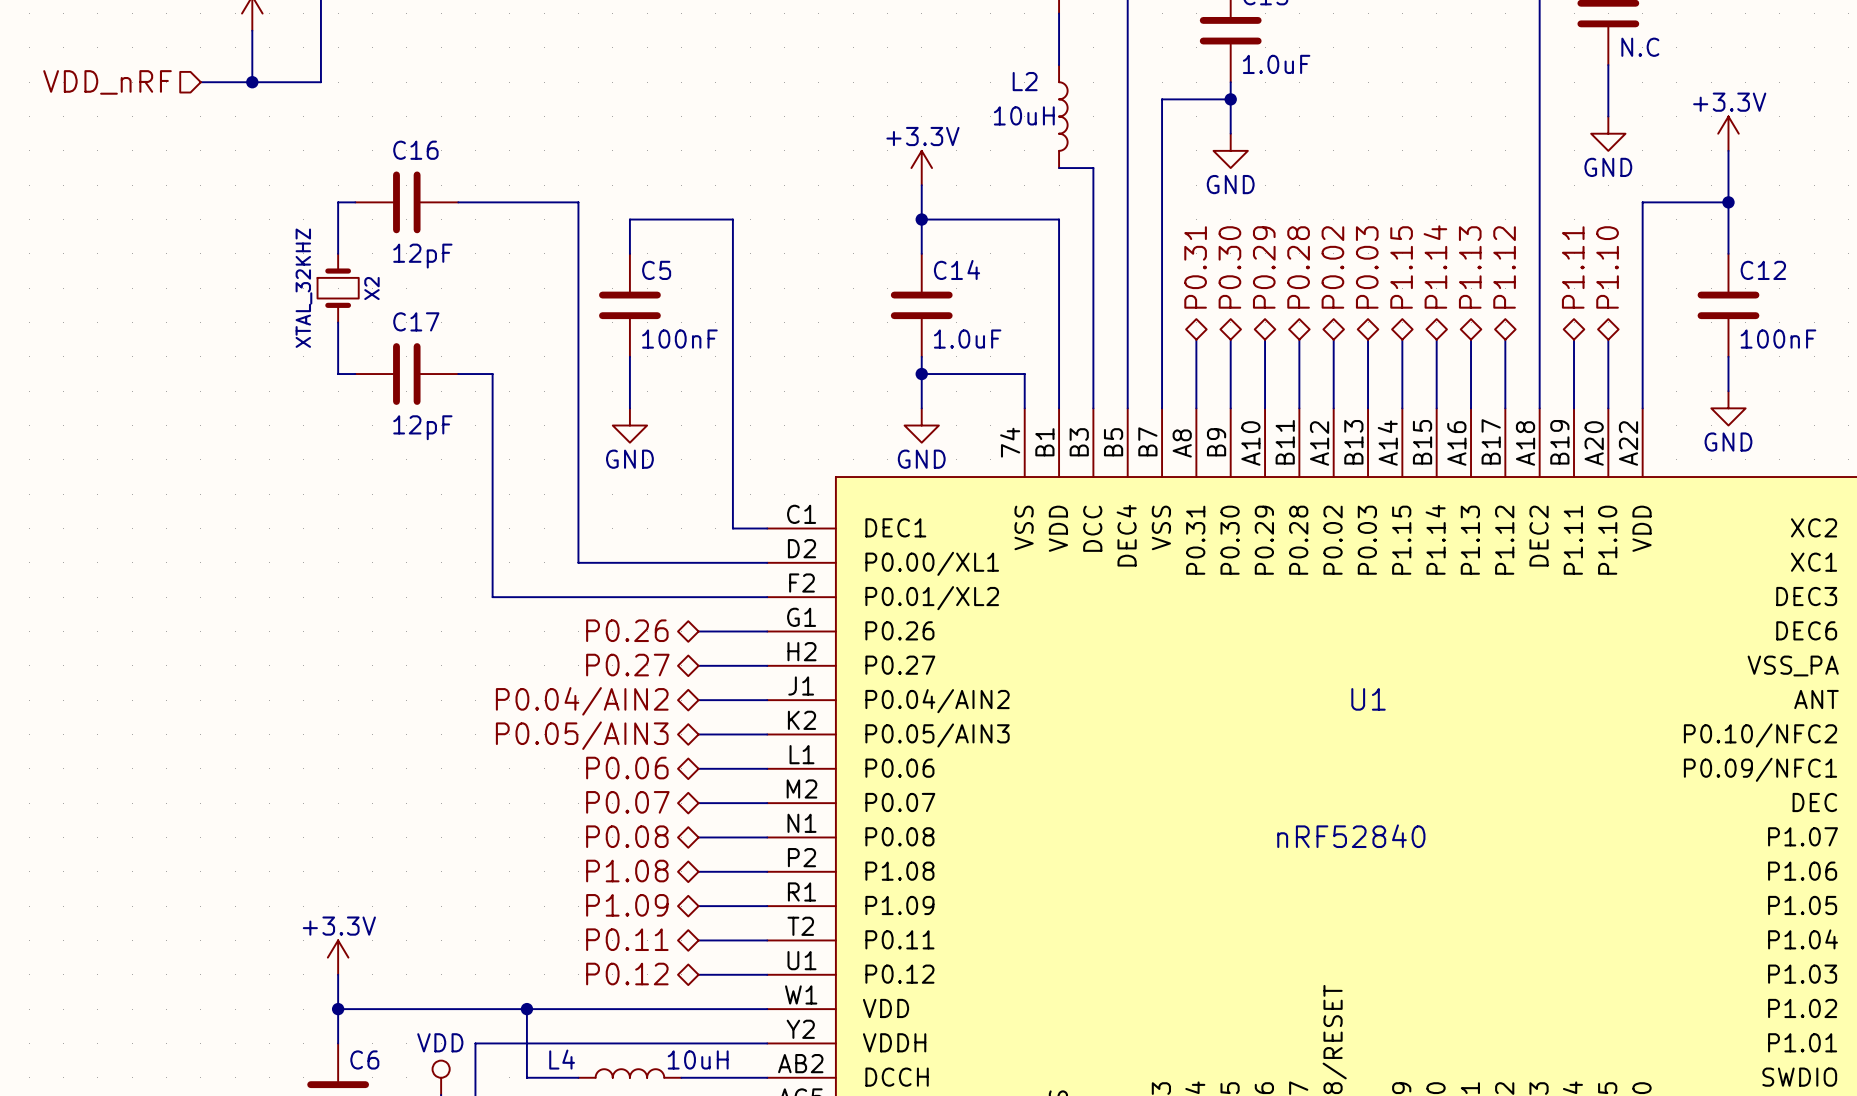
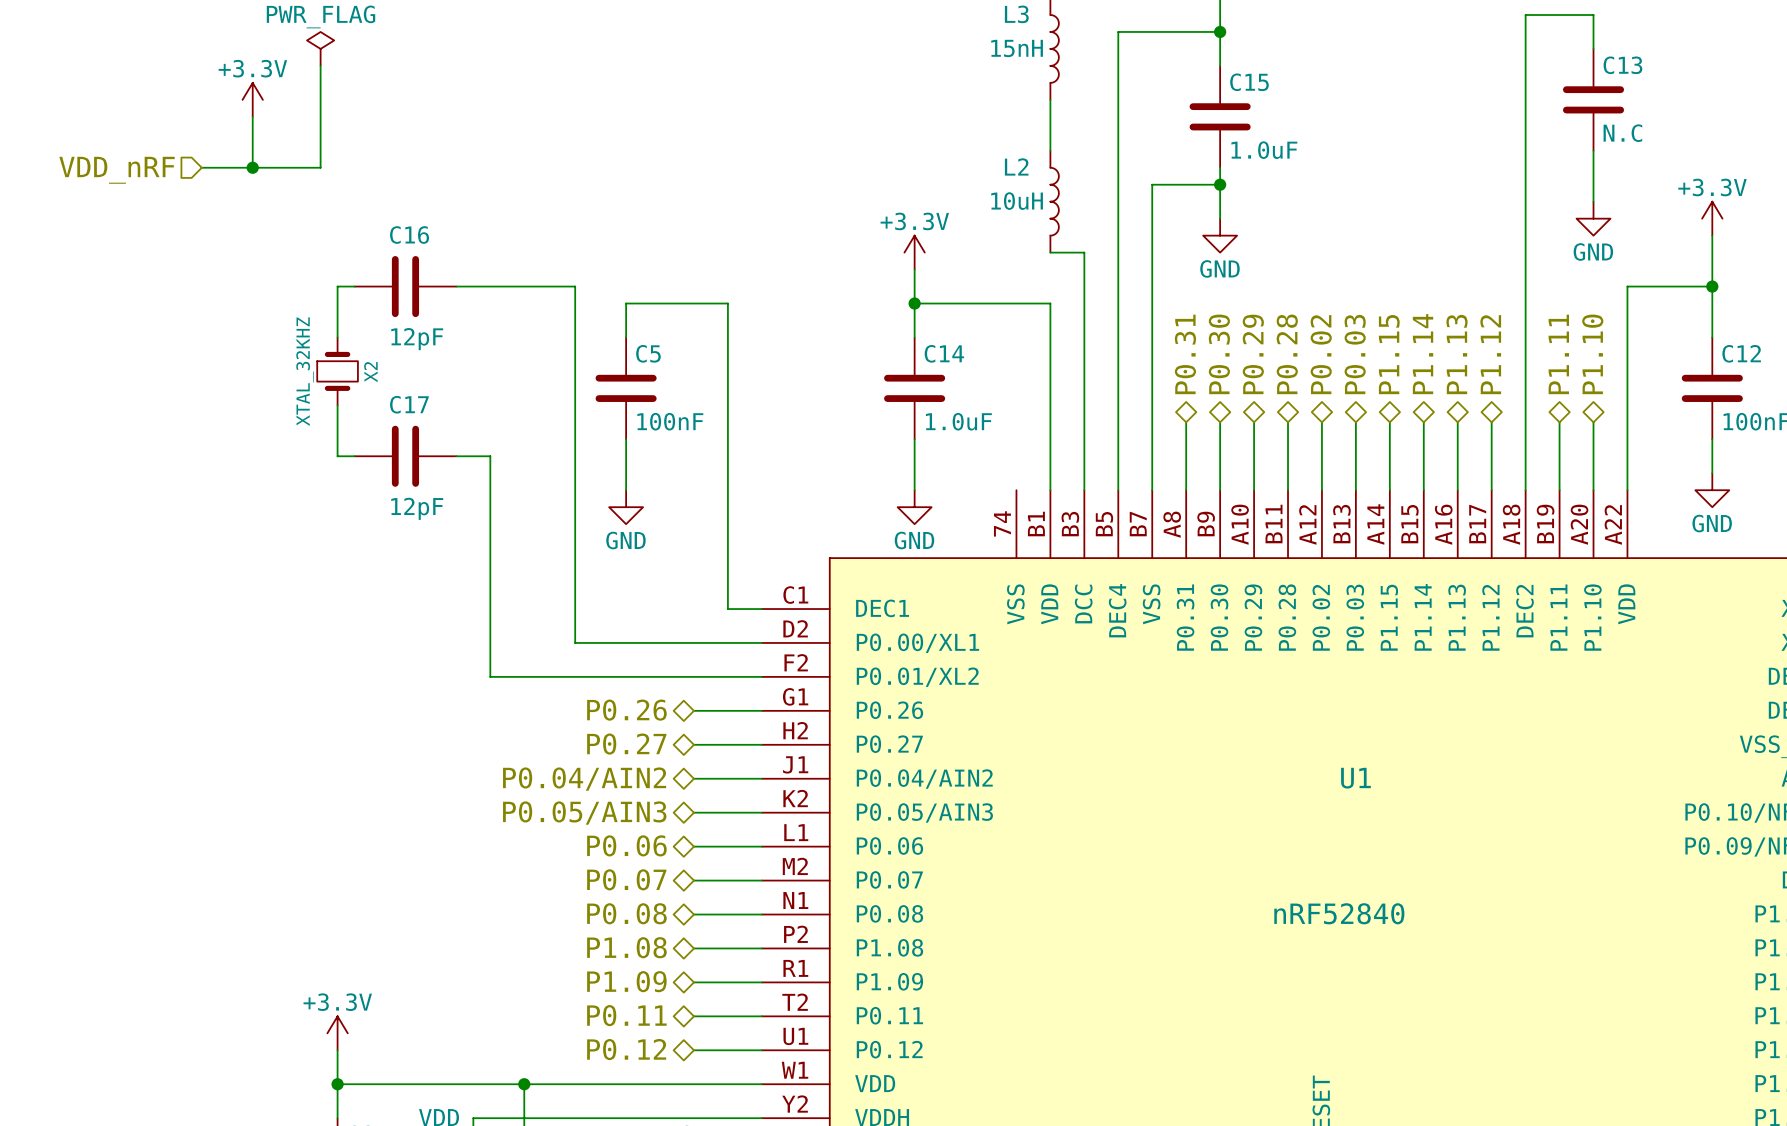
wire: (921, 374) (1024, 374) (1024, 408) -> none
junction: (921, 374) -> none

